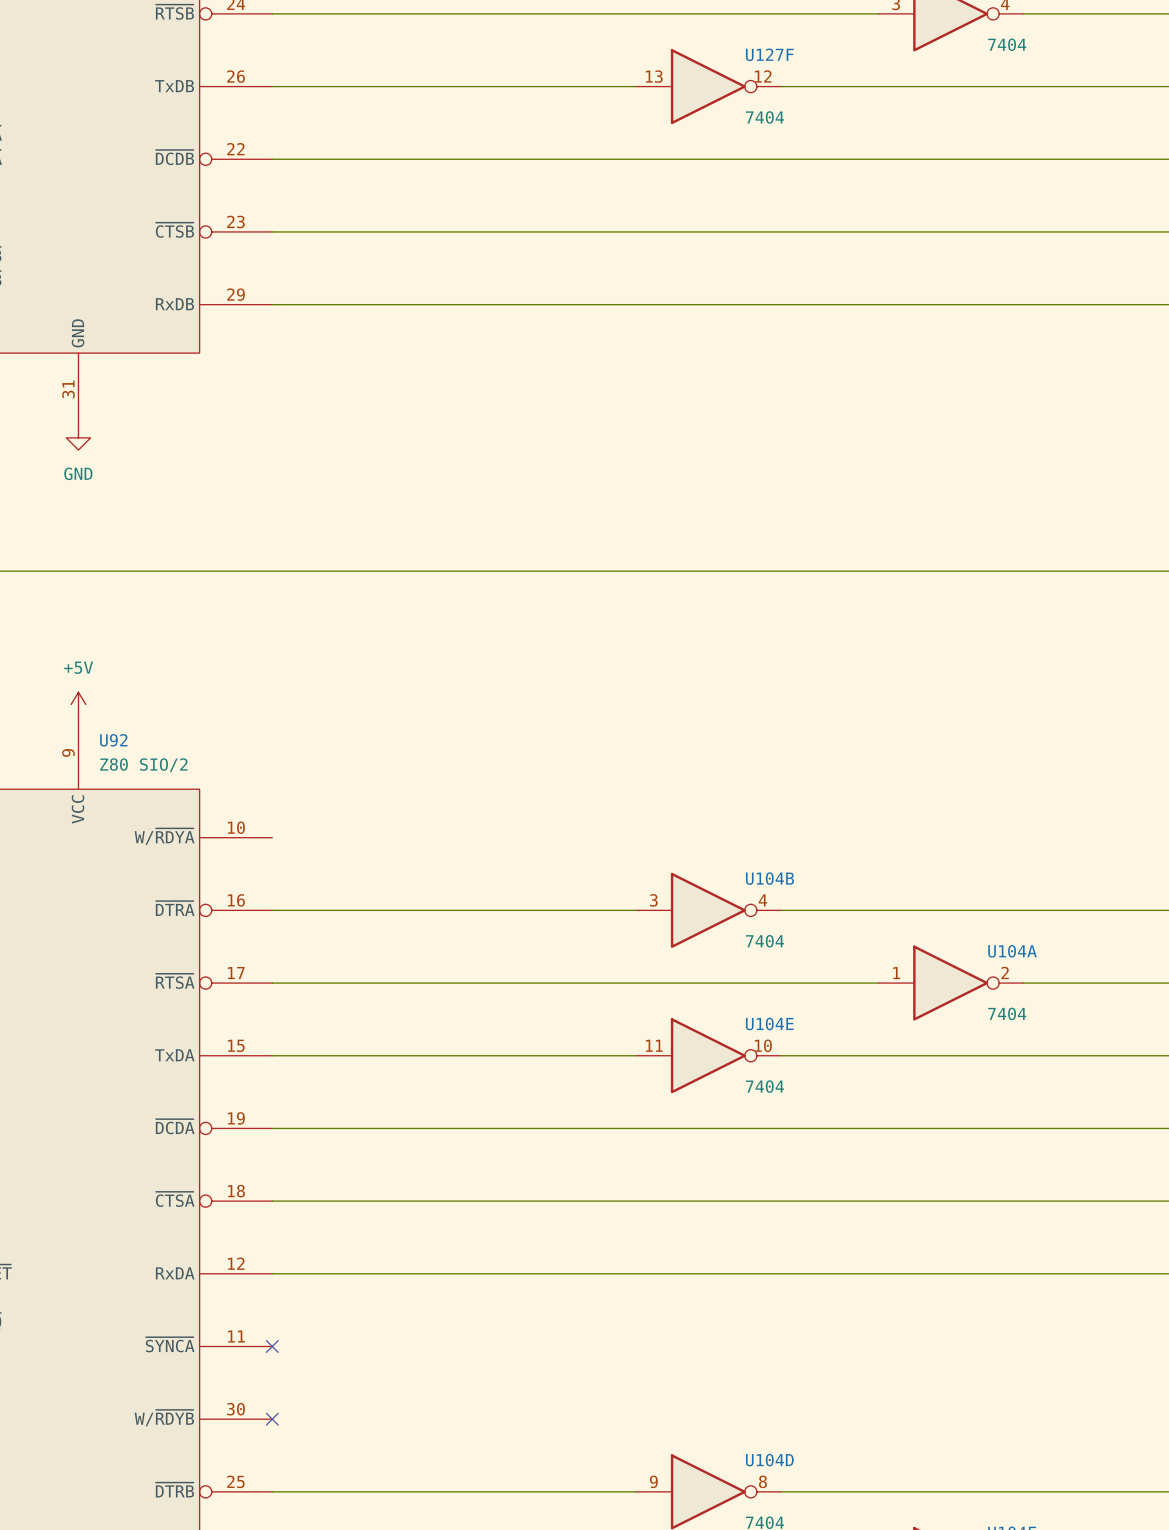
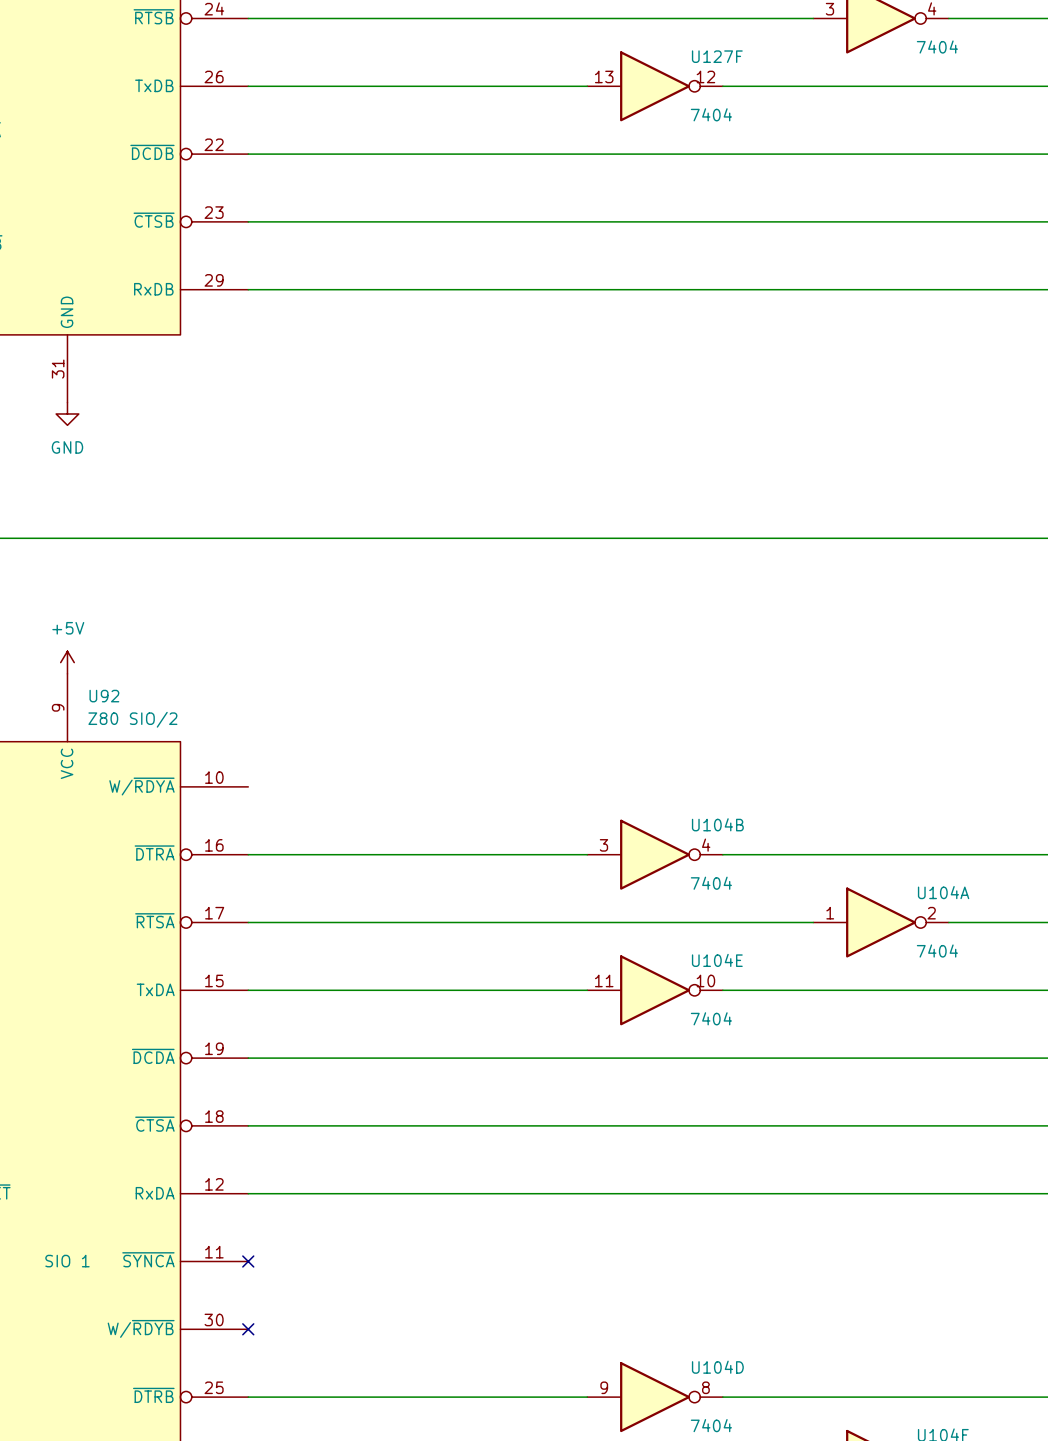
U92 text: none -> SIO 1 (67, 1261)

